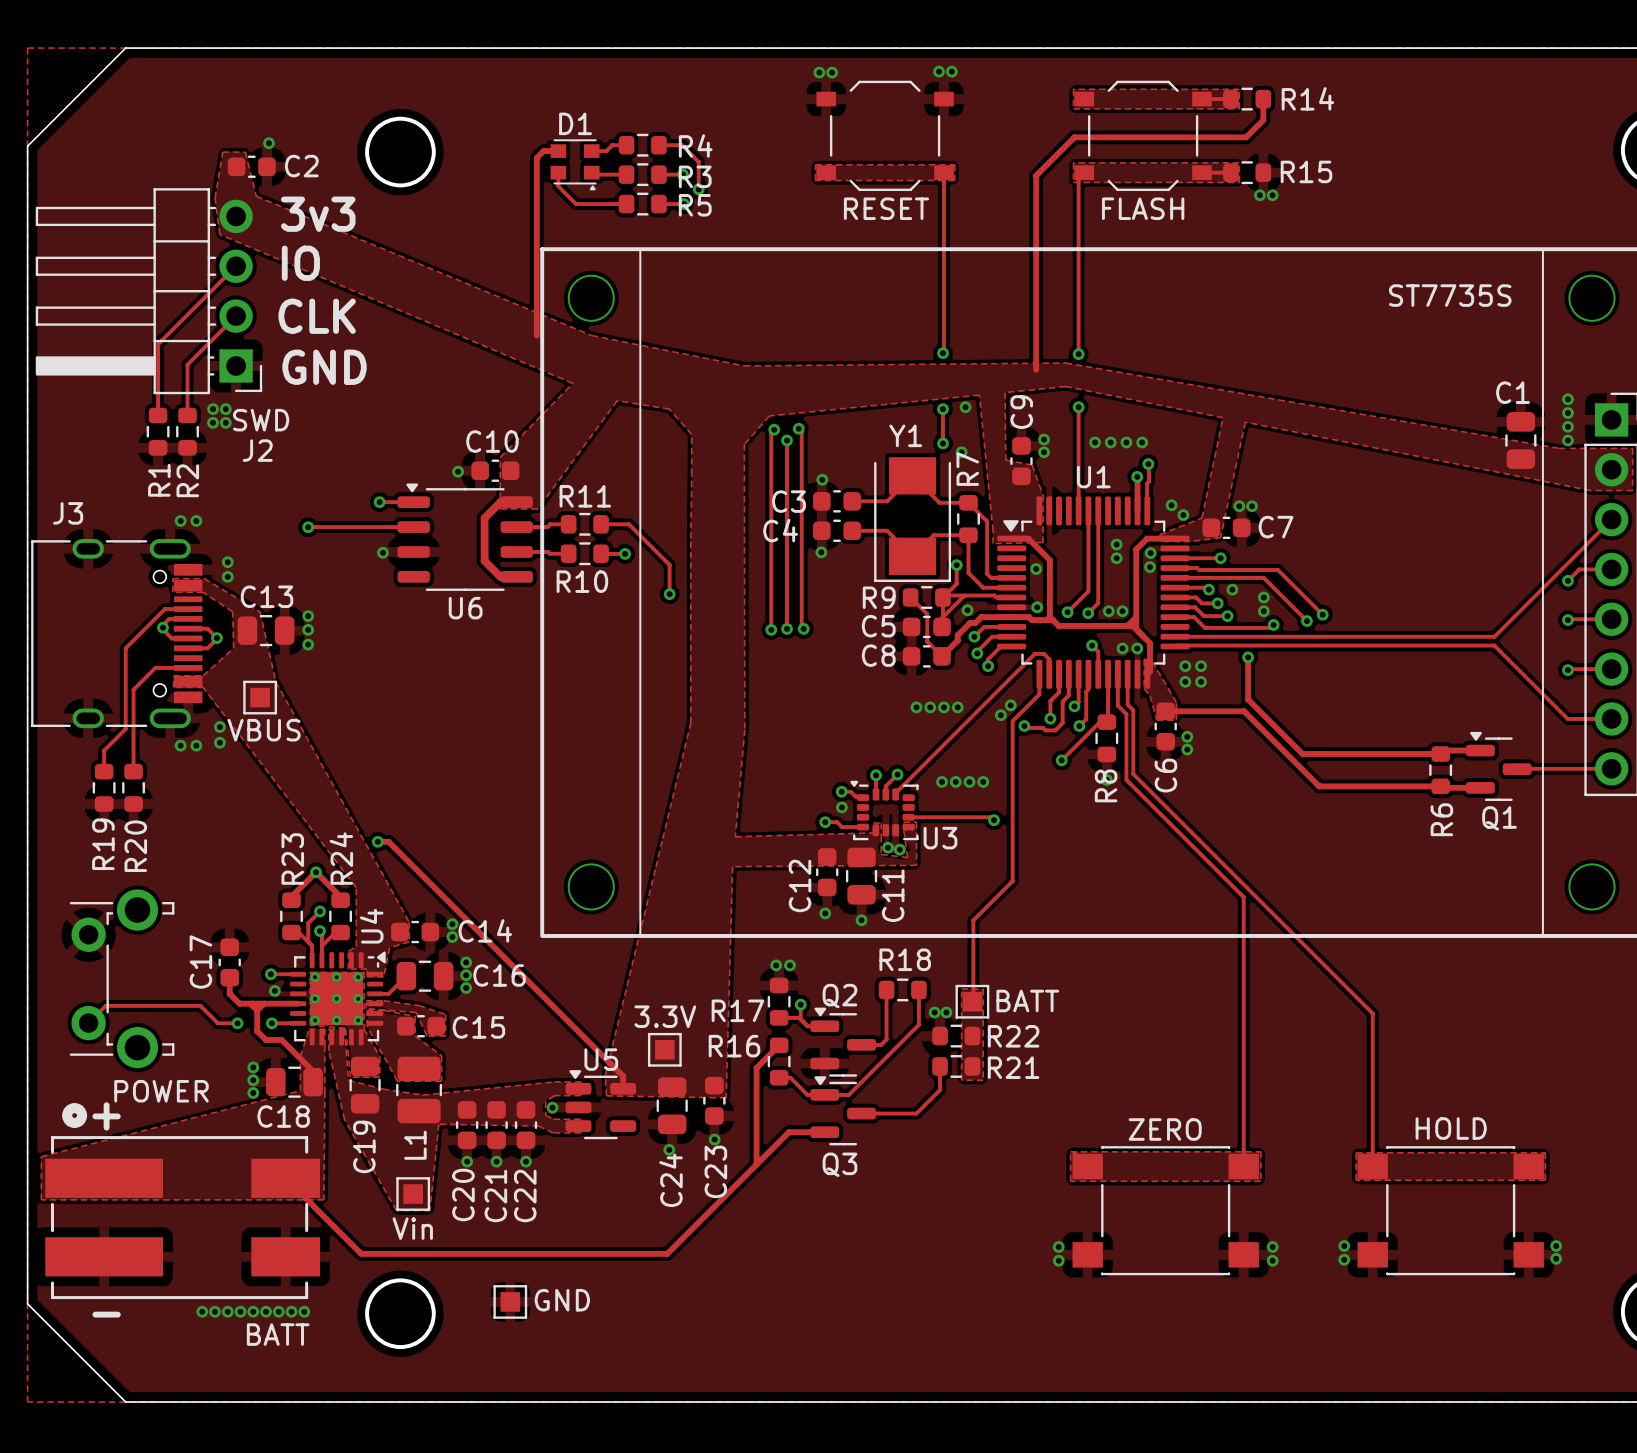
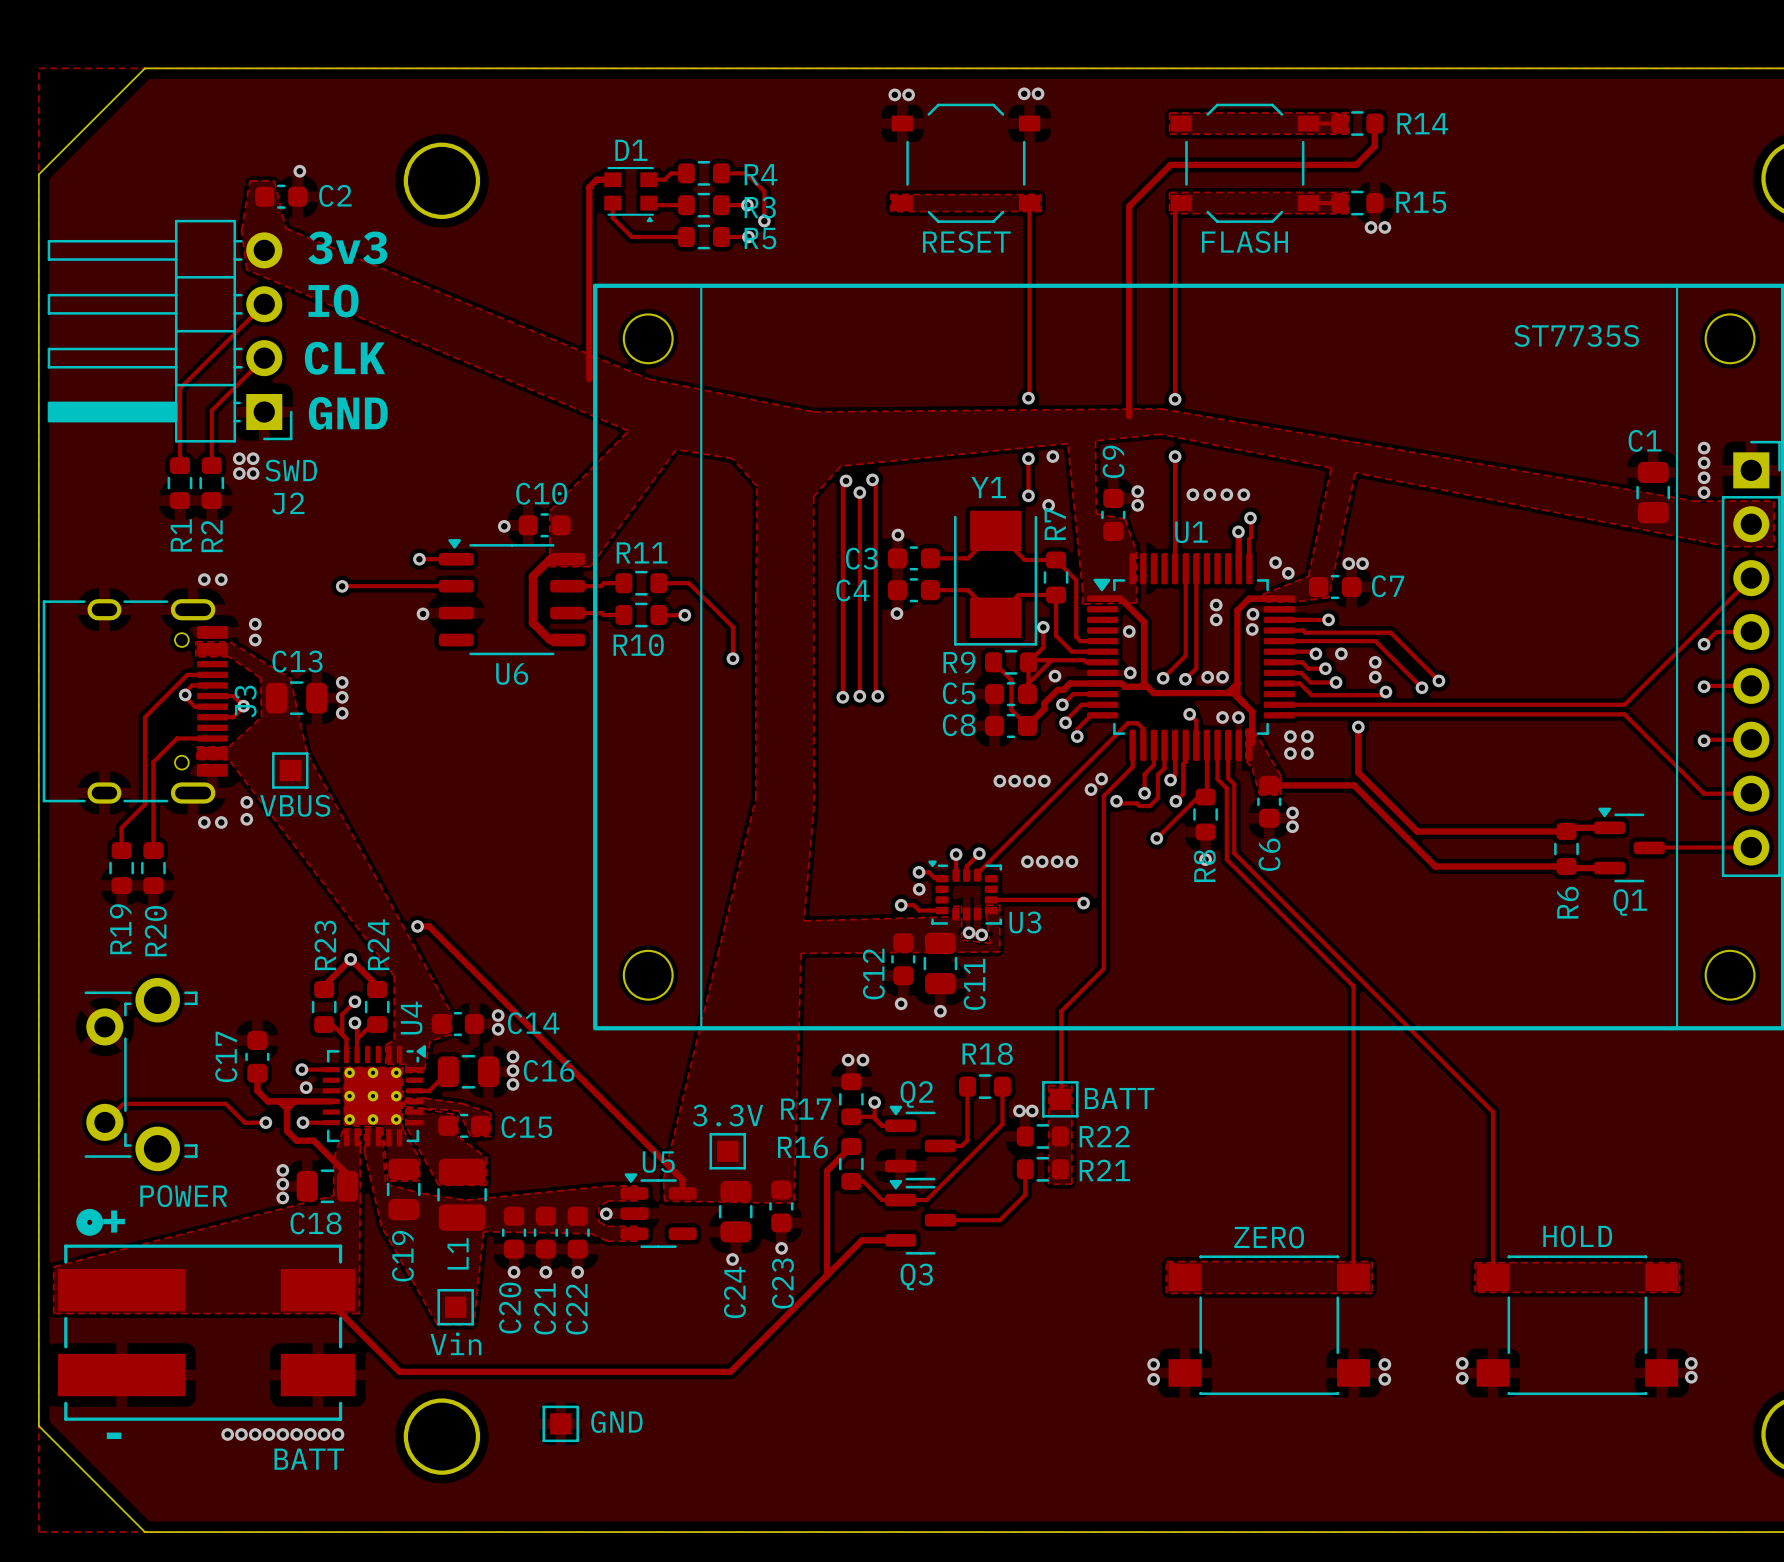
J3 name rotation: 0° (68, 513) -> 90° counterclockwise (245, 701)
J3 name position: J3 (68, 513) -> J3 (245, 701)

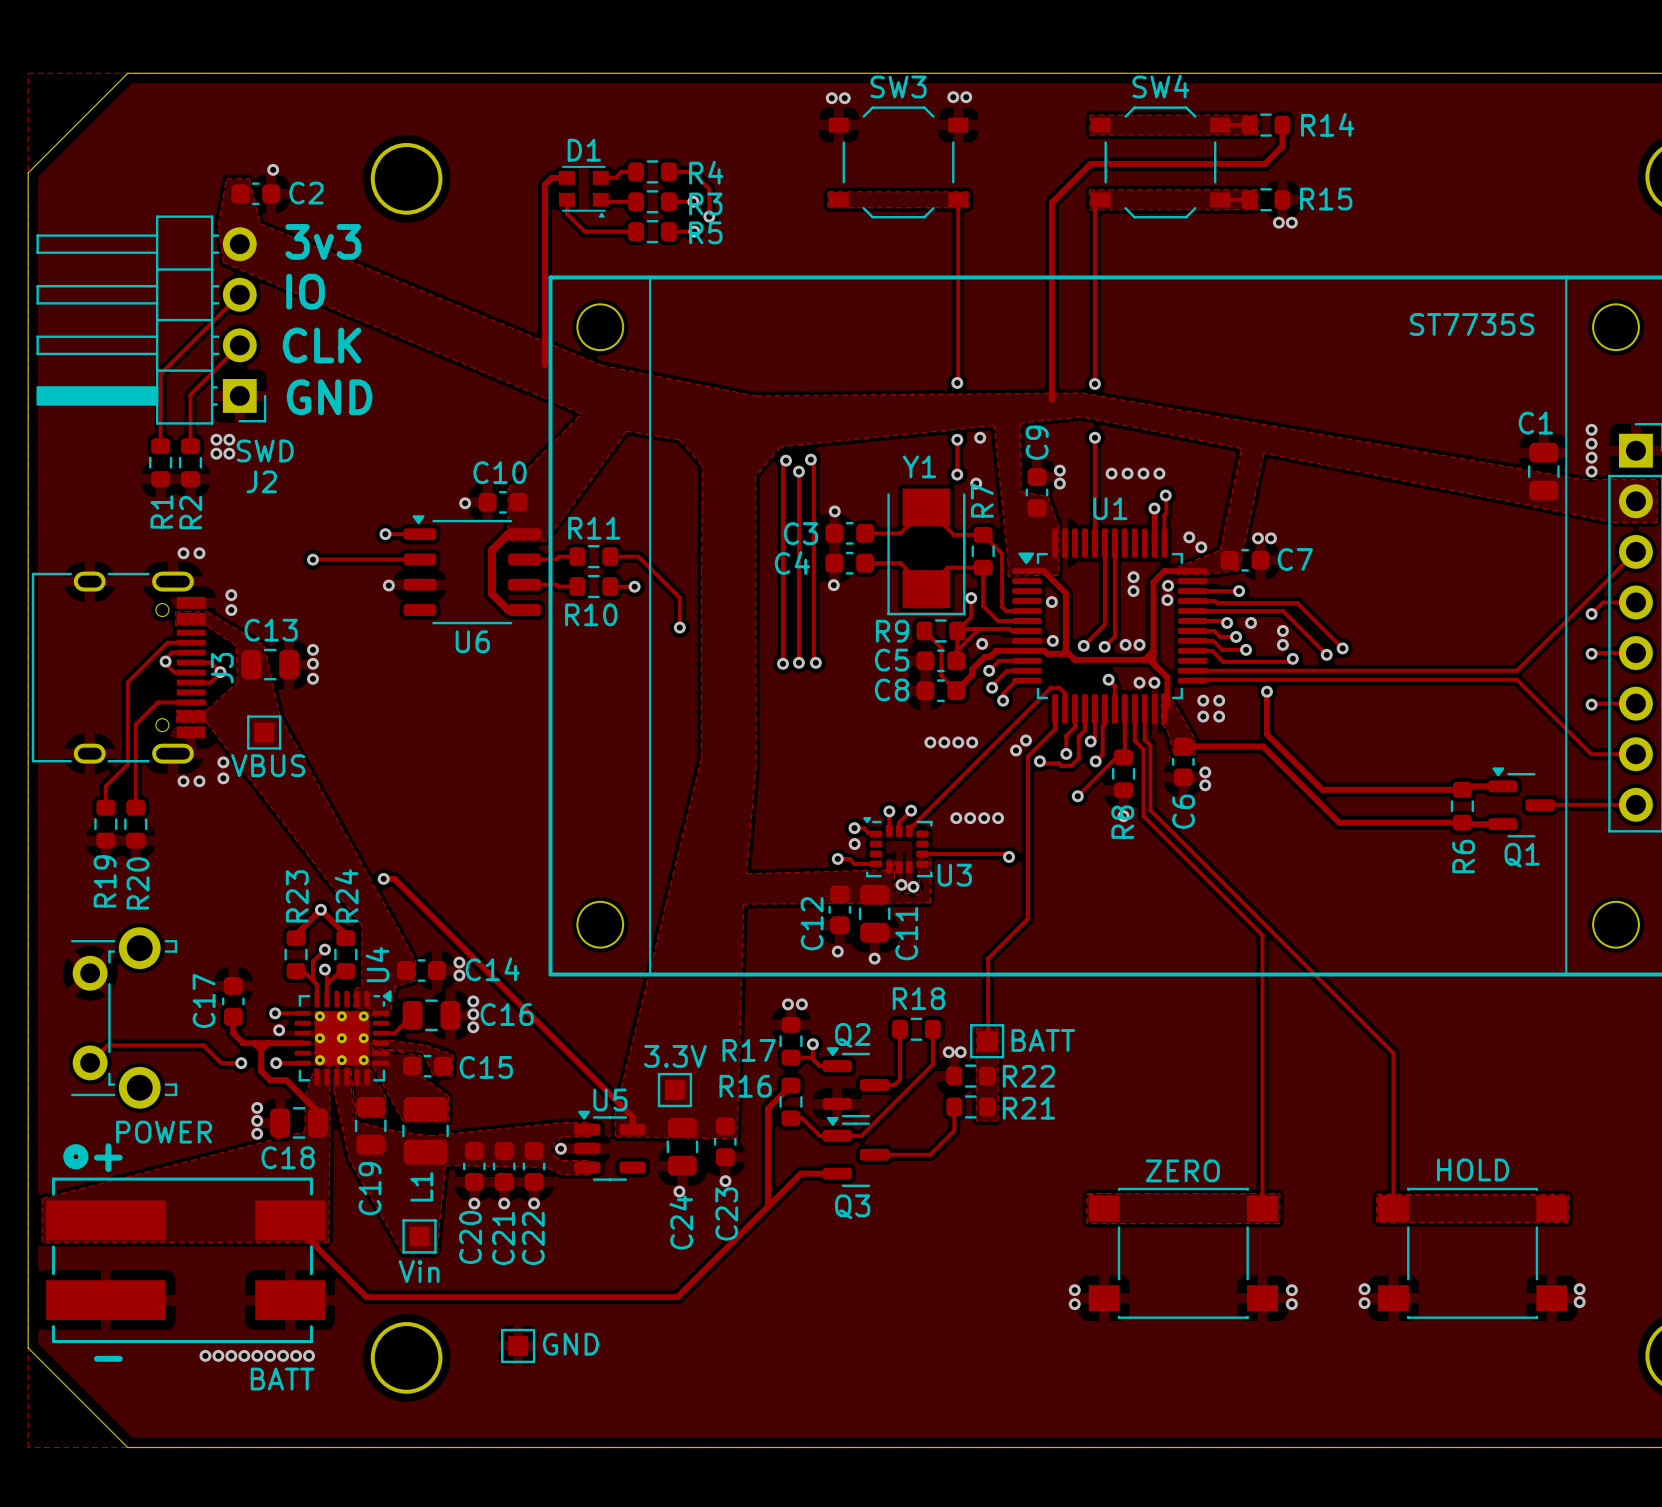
SW3 name: none -> SW3 (898, 86)
SW4 name: none -> SW4 (1160, 86)
SW3 value: RESET (966, 242) -> none
SW4 value: FLASH (1244, 242) -> none

